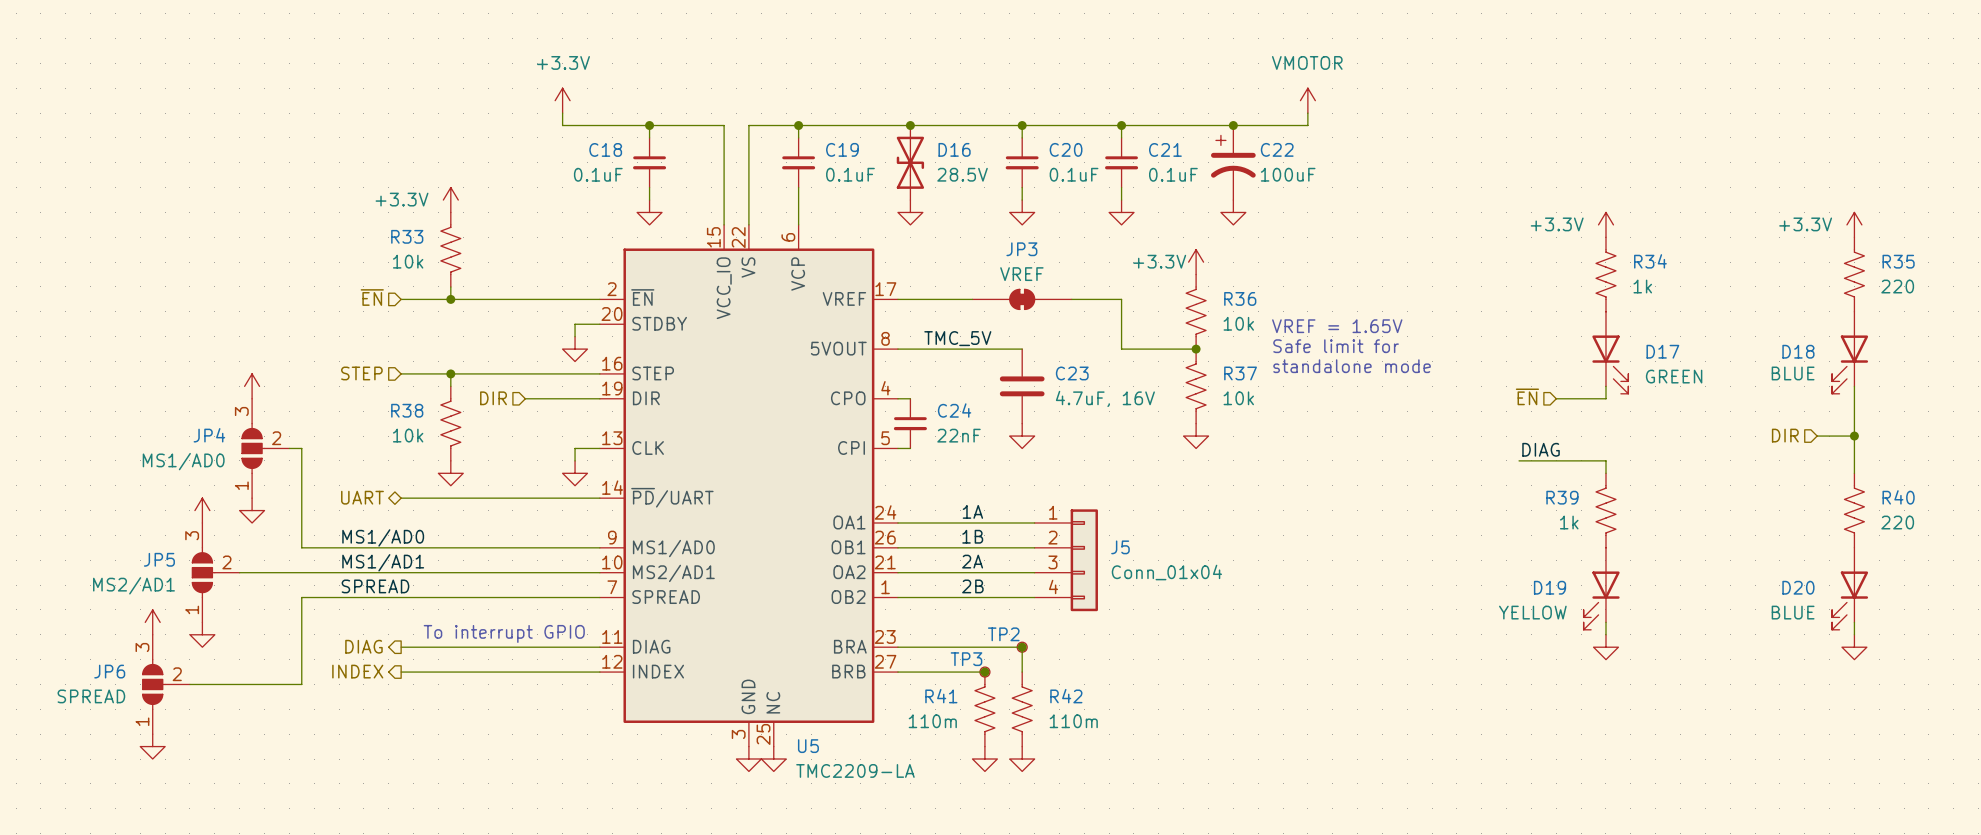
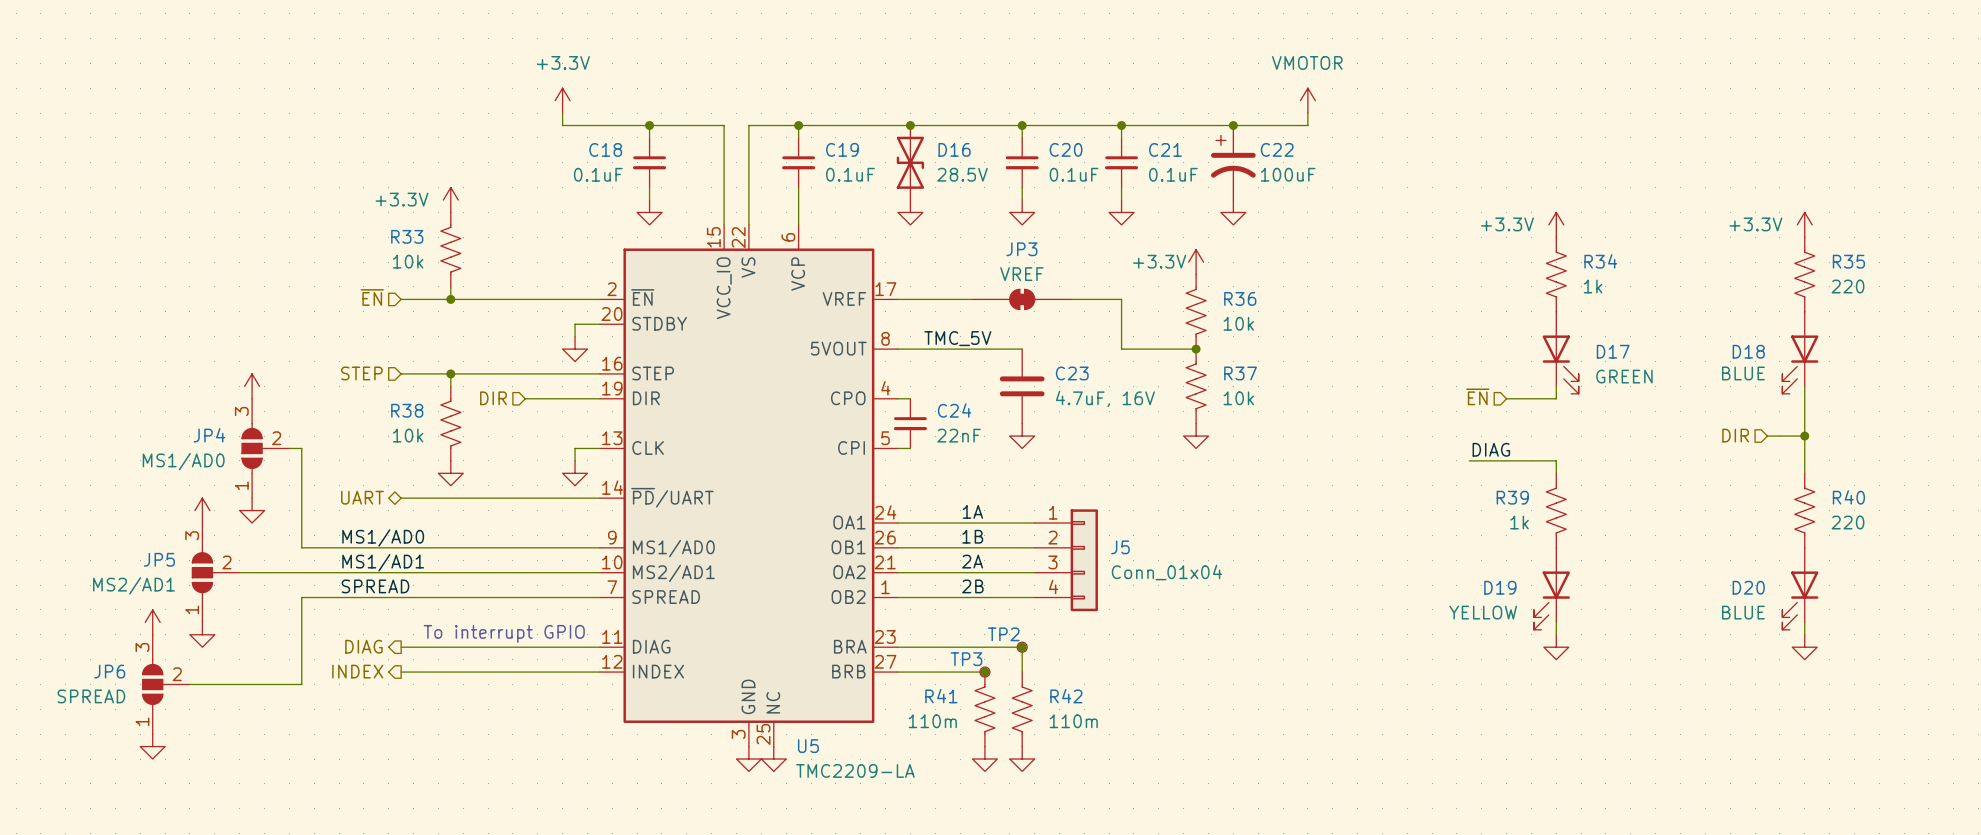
power symbol position: +3.3V (1605, 224) -> +3.3V (1556, 224)
power symbol position: +3.3V (1854, 224) -> +3.3V (1804, 224)
R34 position: (1605, 274) -> (1556, 274)
R35 position: (1854, 274) -> (1804, 274)
text: VREF = 1.65V (1337, 326) -> none
text: Safe limit for (1336, 346) -> none
D17 position: (1610, 352) -> (1560, 352)
D18 position: (1850, 352) -> (1800, 352)
text: standalone mode (1352, 366) -> none
wire: (1605, 386) (1605, 398) (1556, 398) -> (1556, 386) (1556, 398) (1506, 398)
wire: (1854, 386) (1854, 473) -> (1804, 386) (1804, 473)
hierarchical label position: ~{EN} (1527, 396) -> ~{EN} (1477, 396)
hierarchical label position: DIR (1785, 435) -> DIR (1735, 435)
wire: (1817, 436) (1854, 436) -> (1767, 436) (1804, 436)
junction position: (1854, 436) -> (1804, 436)
label position: DIAG (1541, 449) -> DIAG (1491, 449)
wire: none -> (1469, 460) (1519, 460)
wire: (1556, 460) (1605, 460) (1605, 473) -> (1556, 460) (1556, 473)
R39 position: (1605, 510) -> (1556, 510)
R40 position: (1854, 510) -> (1804, 510)
D19 position: (1601, 588) -> (1551, 588)
D20 position: (1850, 588) -> (1800, 588)
wire: (1605, 622) (1605, 634) -> (1556, 622) (1556, 634)
wire: (1854, 622) (1854, 634) -> (1804, 622) (1804, 634)
power symbol position: (1605, 647) -> (1556, 647)
power symbol position: (1854, 647) -> (1804, 647)

